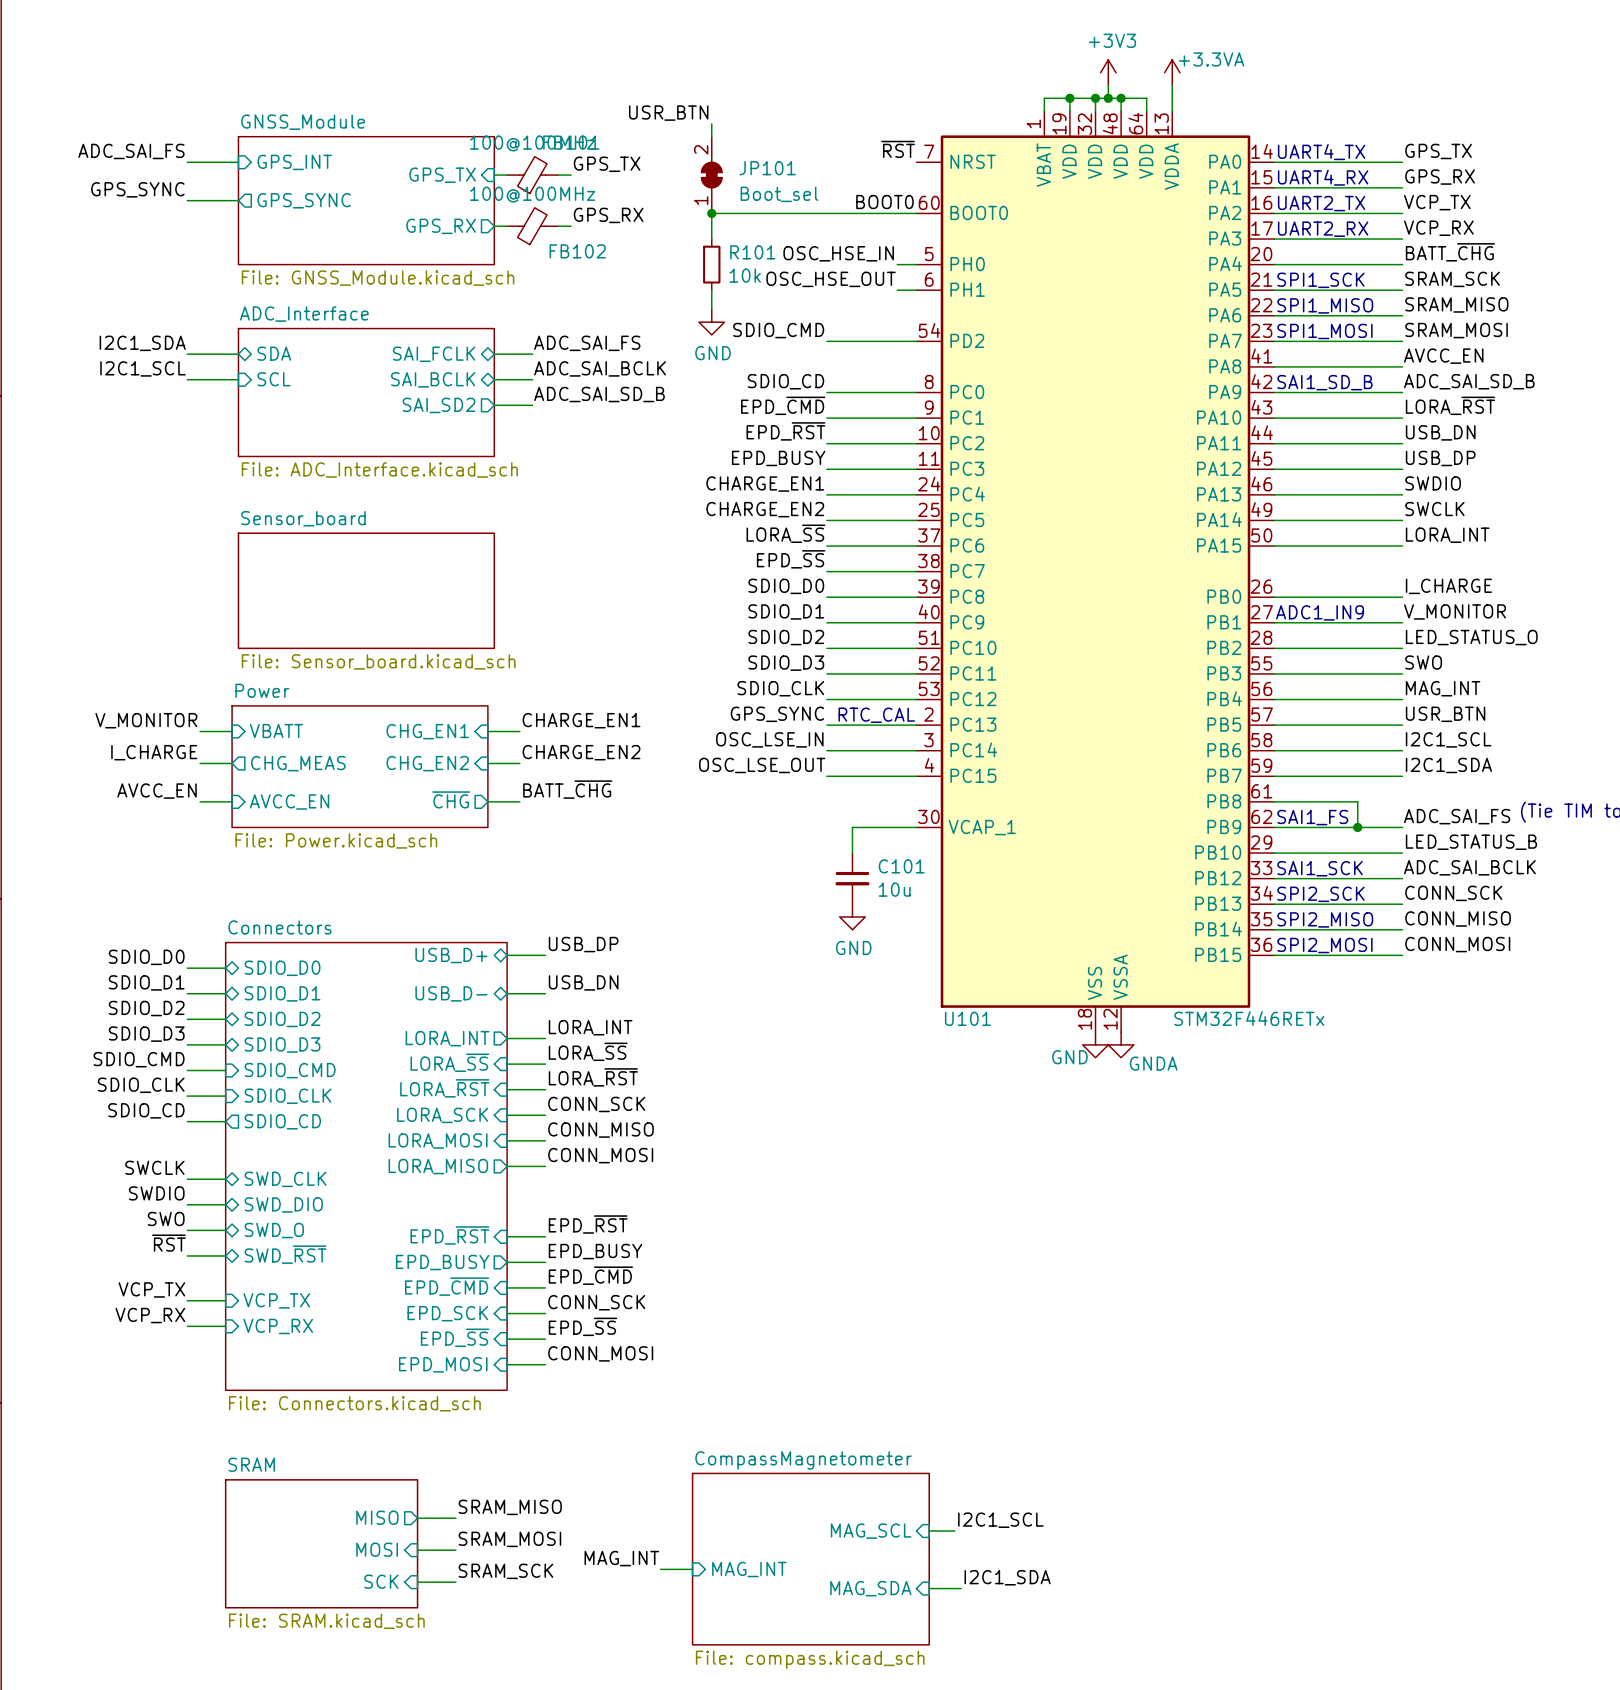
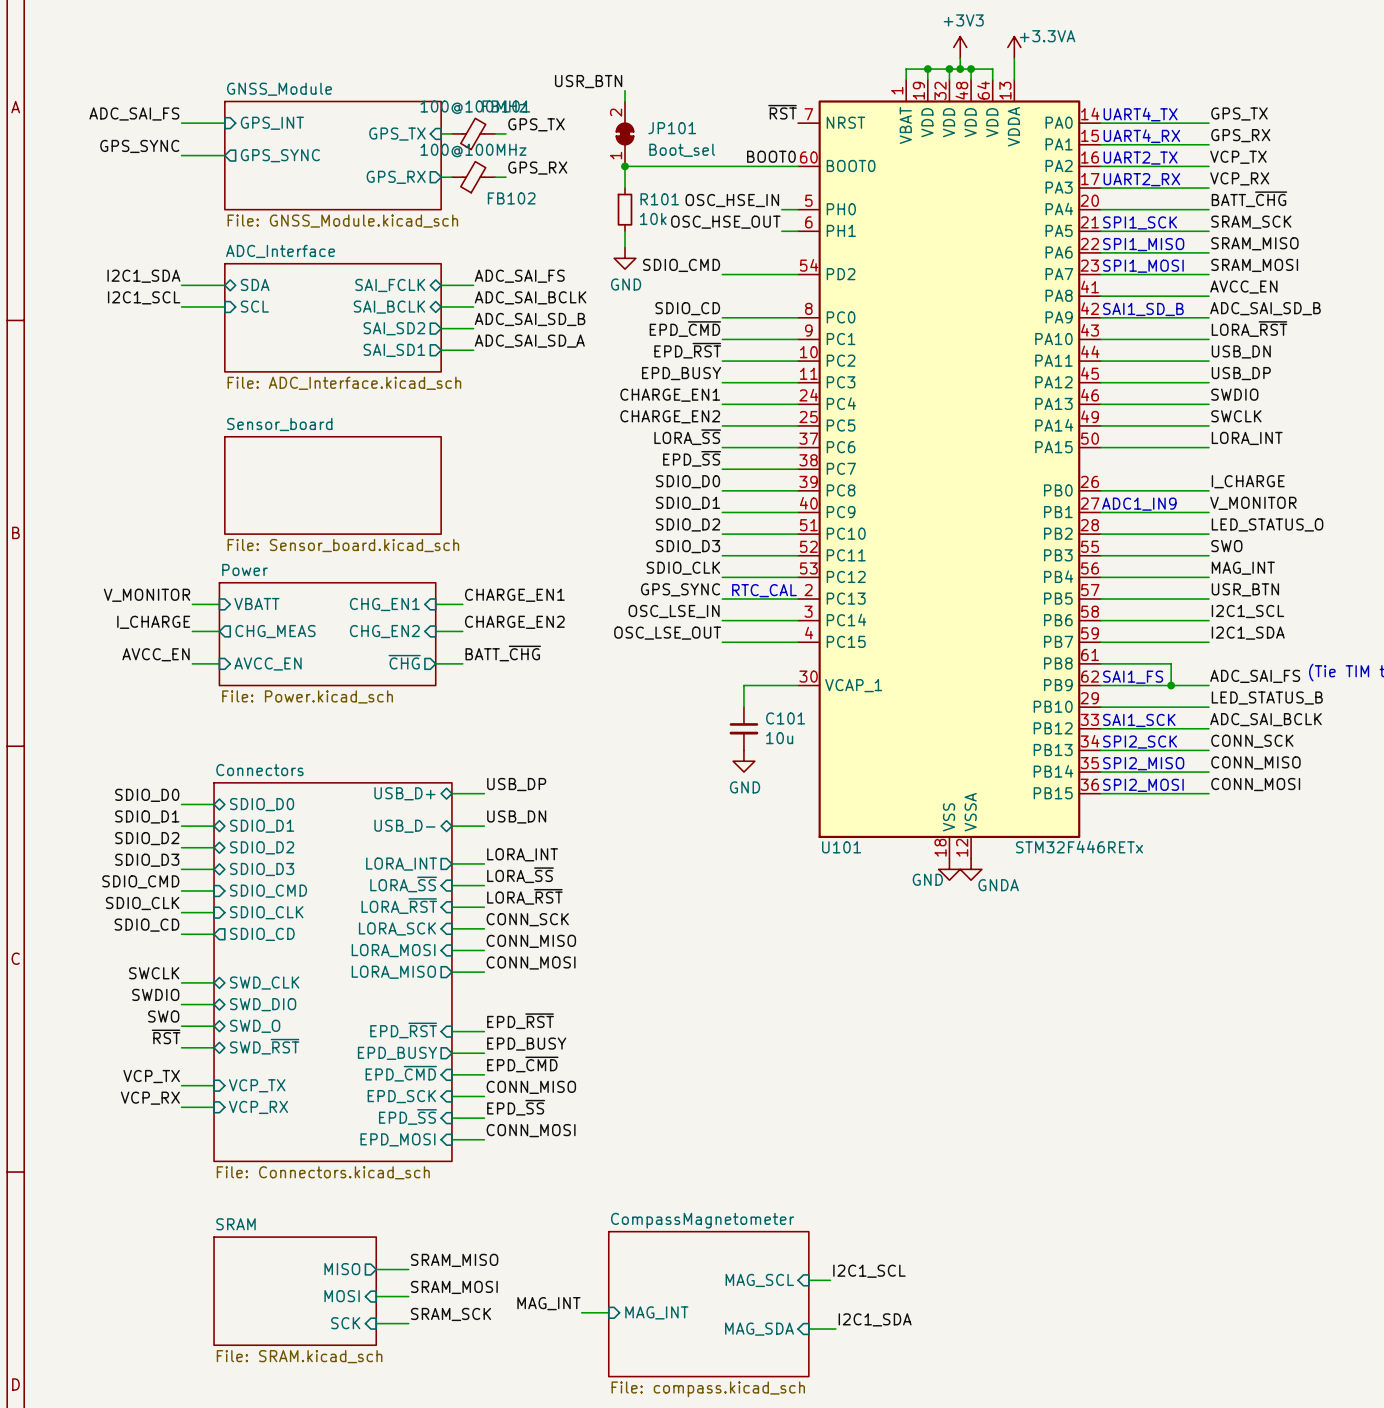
label: none -> ADC_SAI_SD_A (529, 341)
wire: none -> (441, 350) (473, 350)
sheet pin: none -> SAI_SD1 (394, 350)
label: CONN_SCK (596, 1302) -> CONN_MISO (531, 1087)

